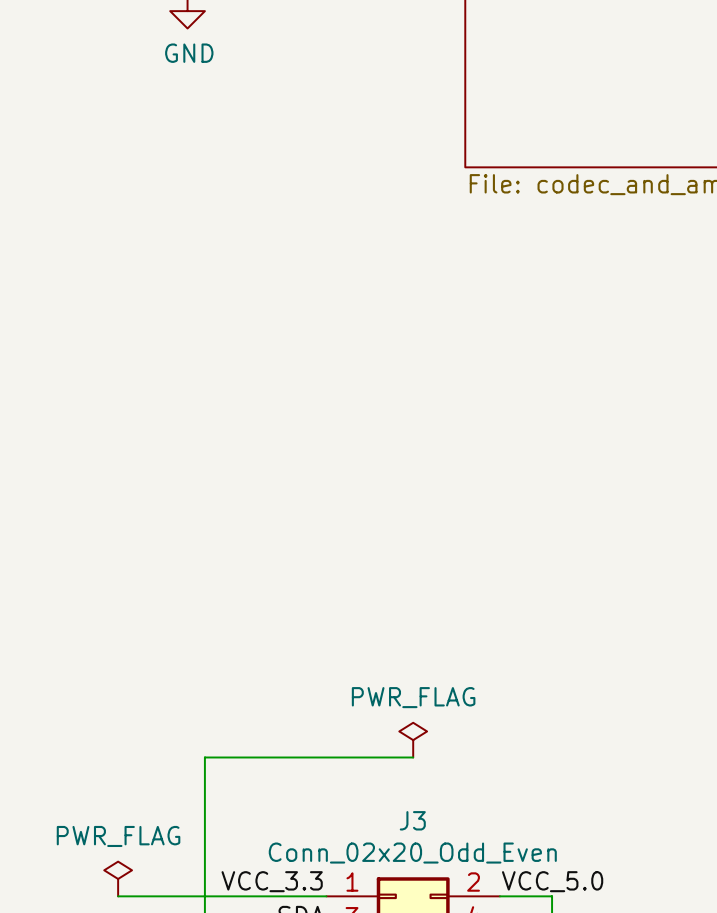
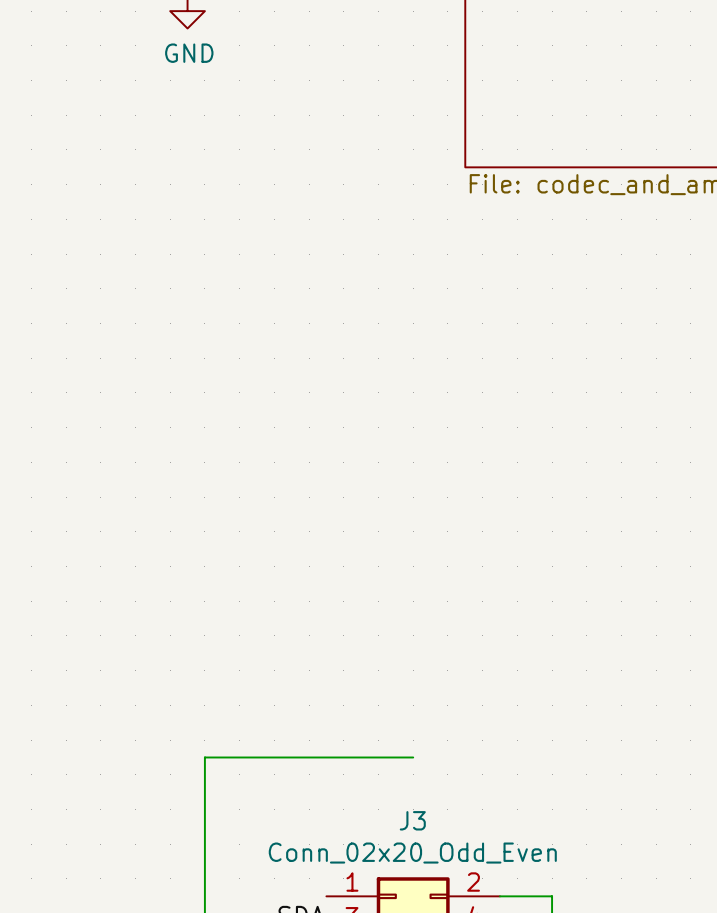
power symbol: PWR_FLAG (413, 740) -> none
power symbol: PWR_FLAG (118, 878) -> none
label: VCC_3.3 (272, 881) -> none
label: VCC_5.0 (552, 881) -> none
wire: (118, 896) (326, 896) -> none

